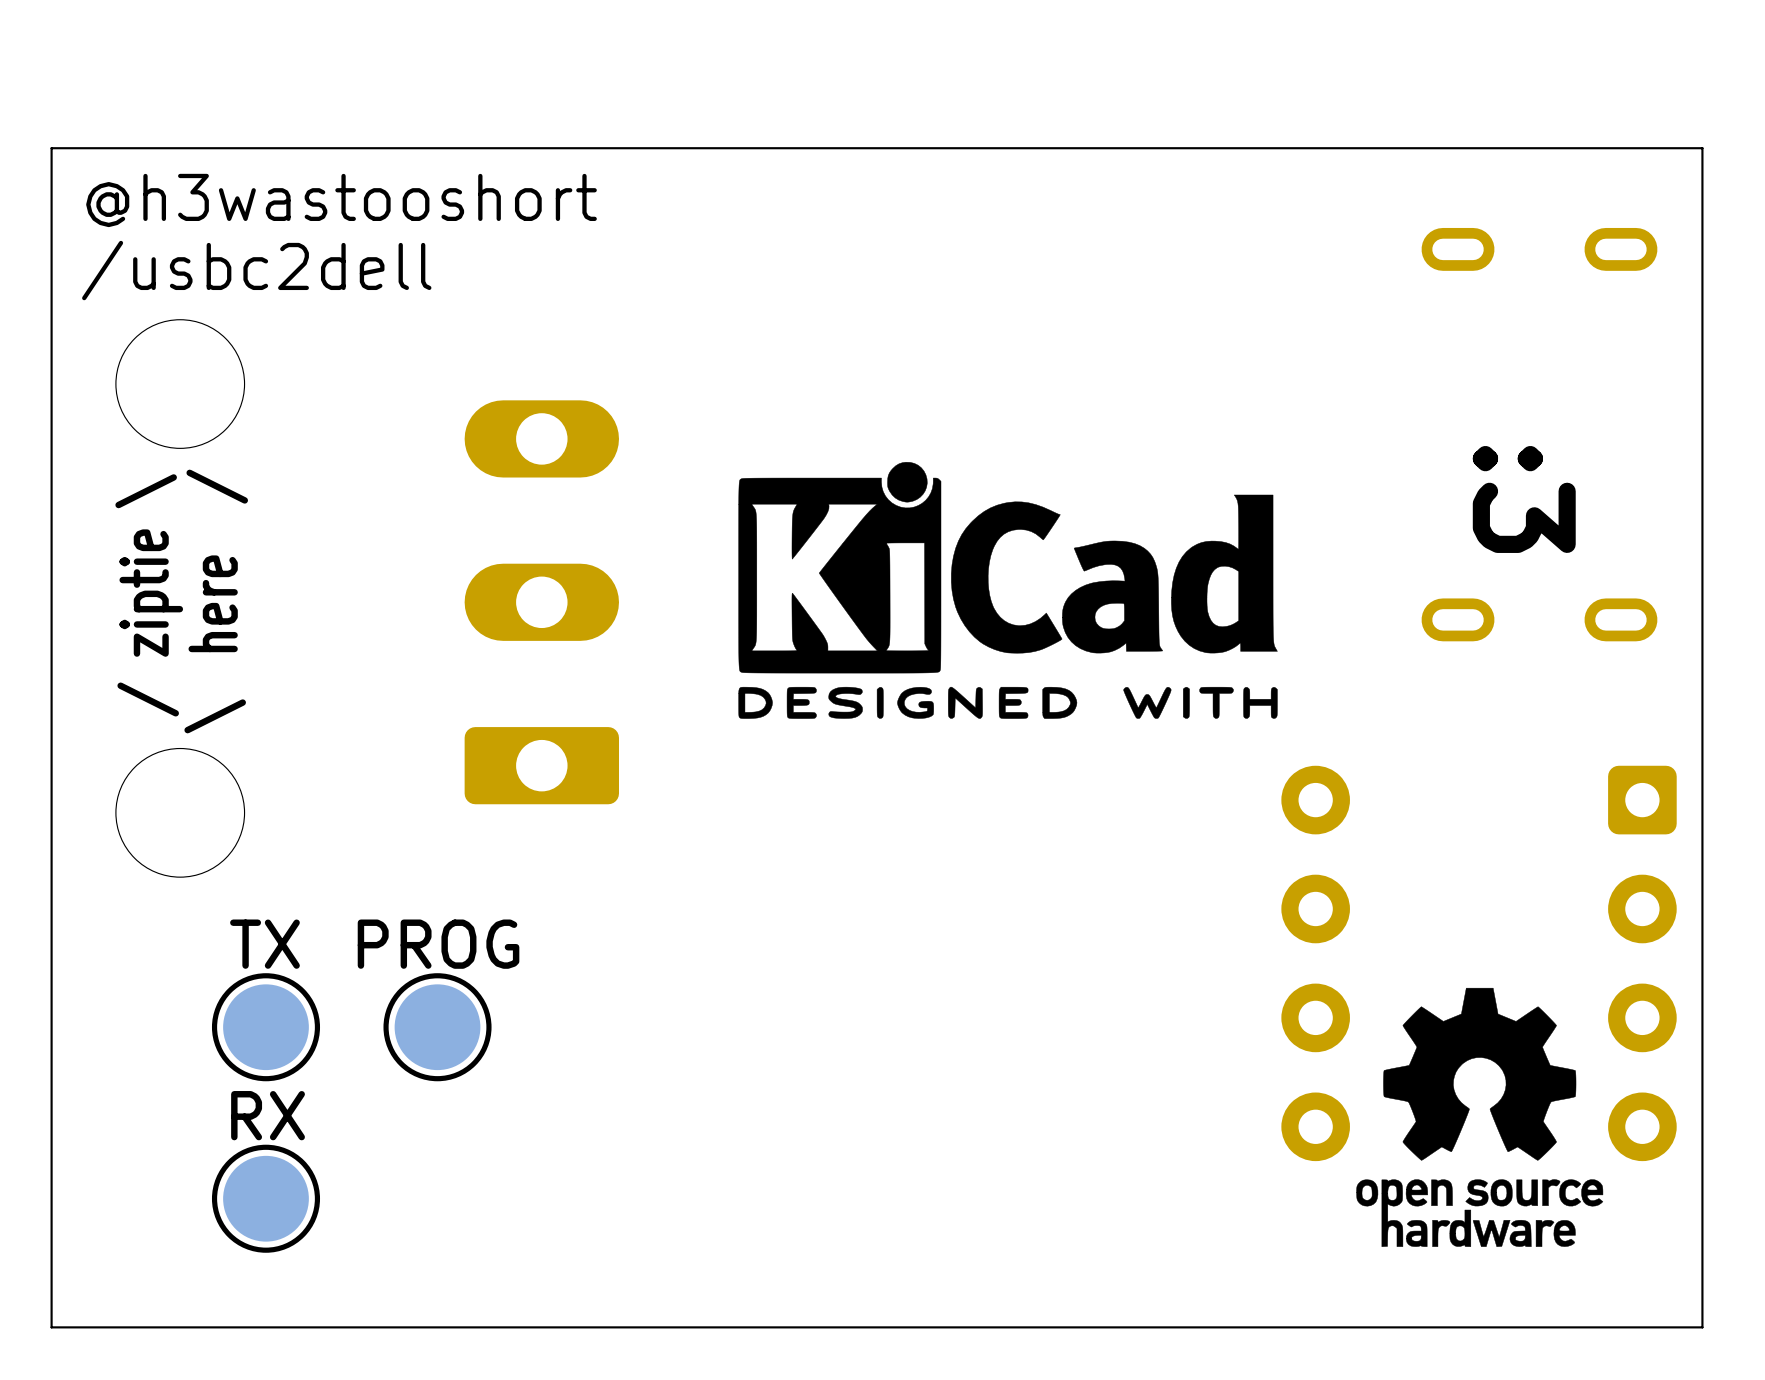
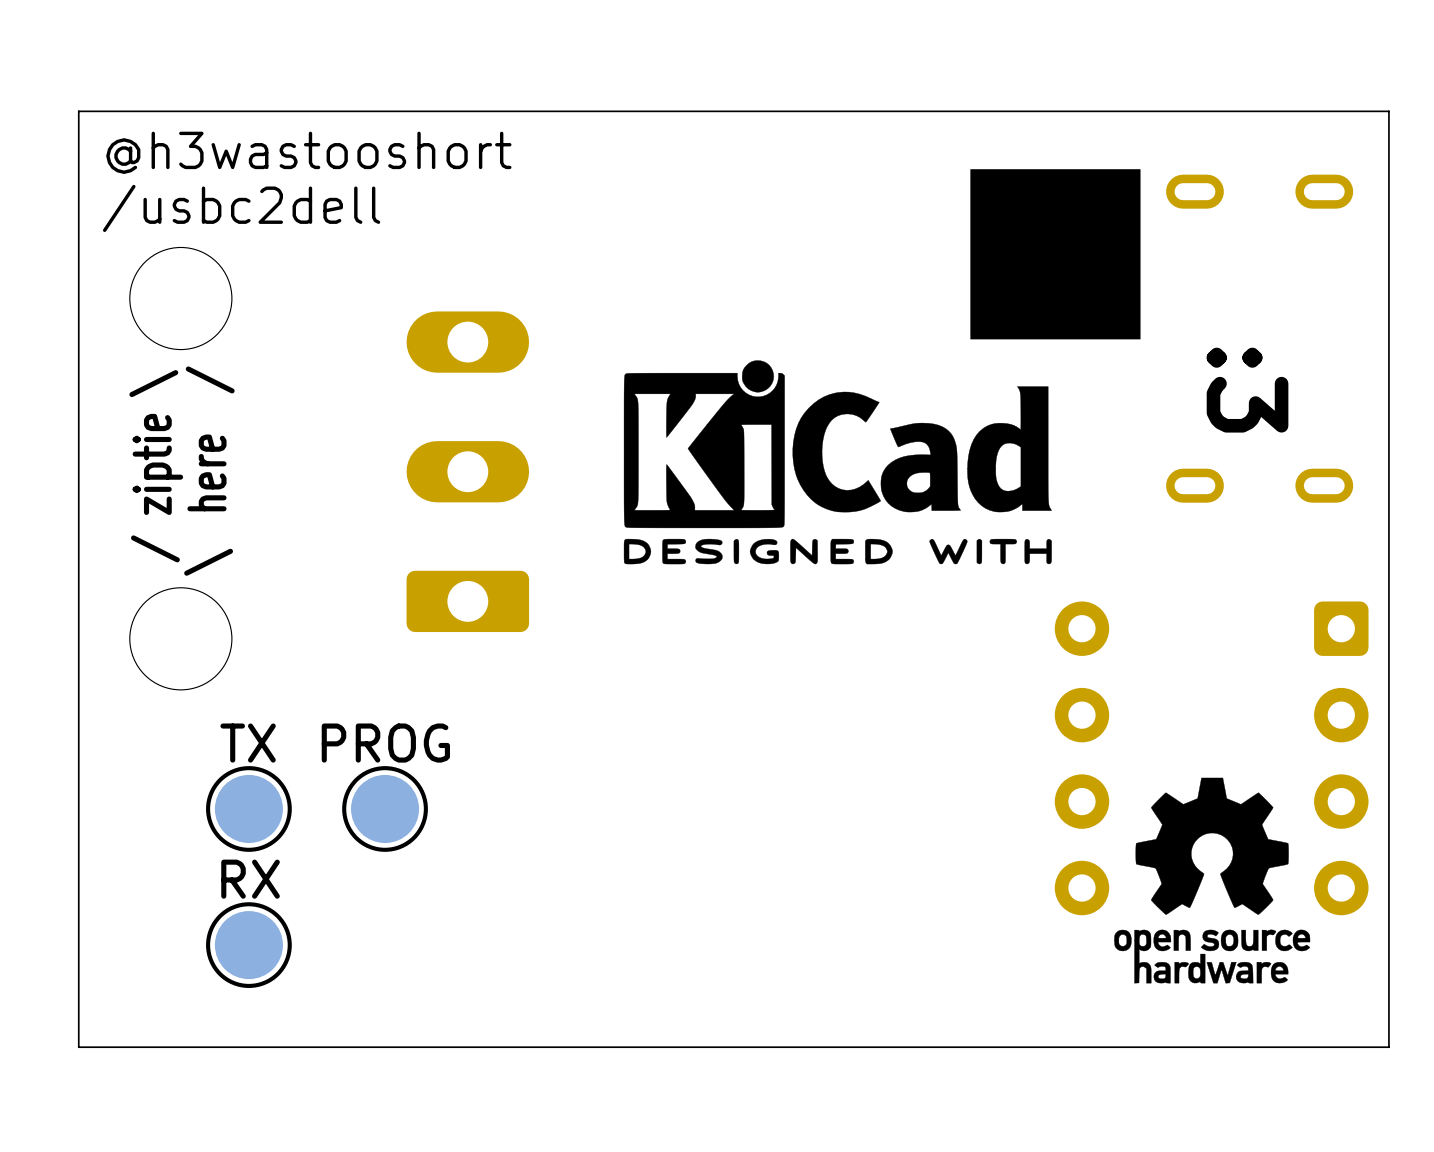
drawing: none -> [970, 169, 1141, 340]

